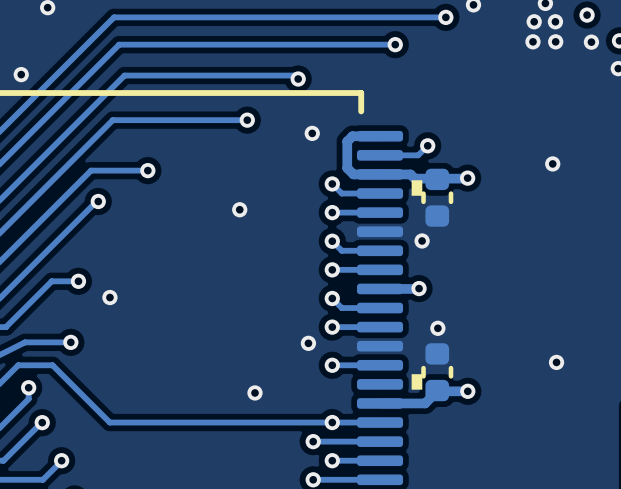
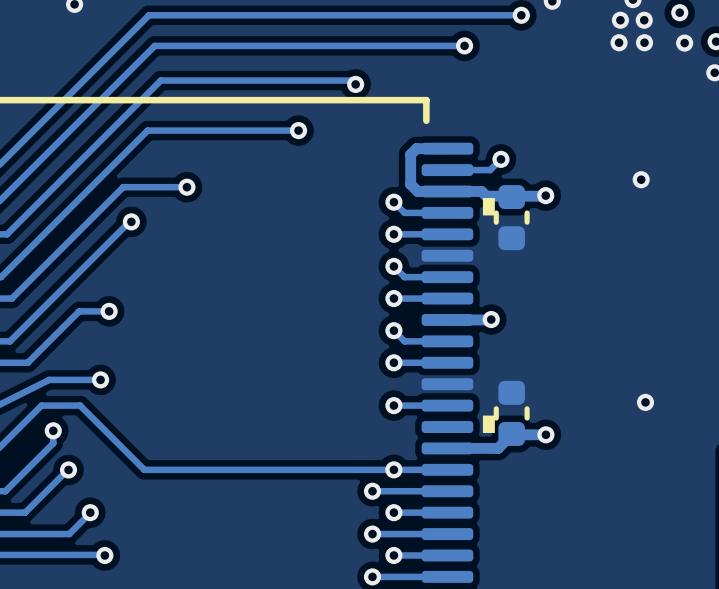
via: (21, 74) -> none
via: (312, 133) -> none
via: (239, 209) -> none
via: (422, 240) -> none
via: (109, 297) -> none
via: (437, 328) -> none
via: (308, 343) -> none
via: (255, 392) -> none

